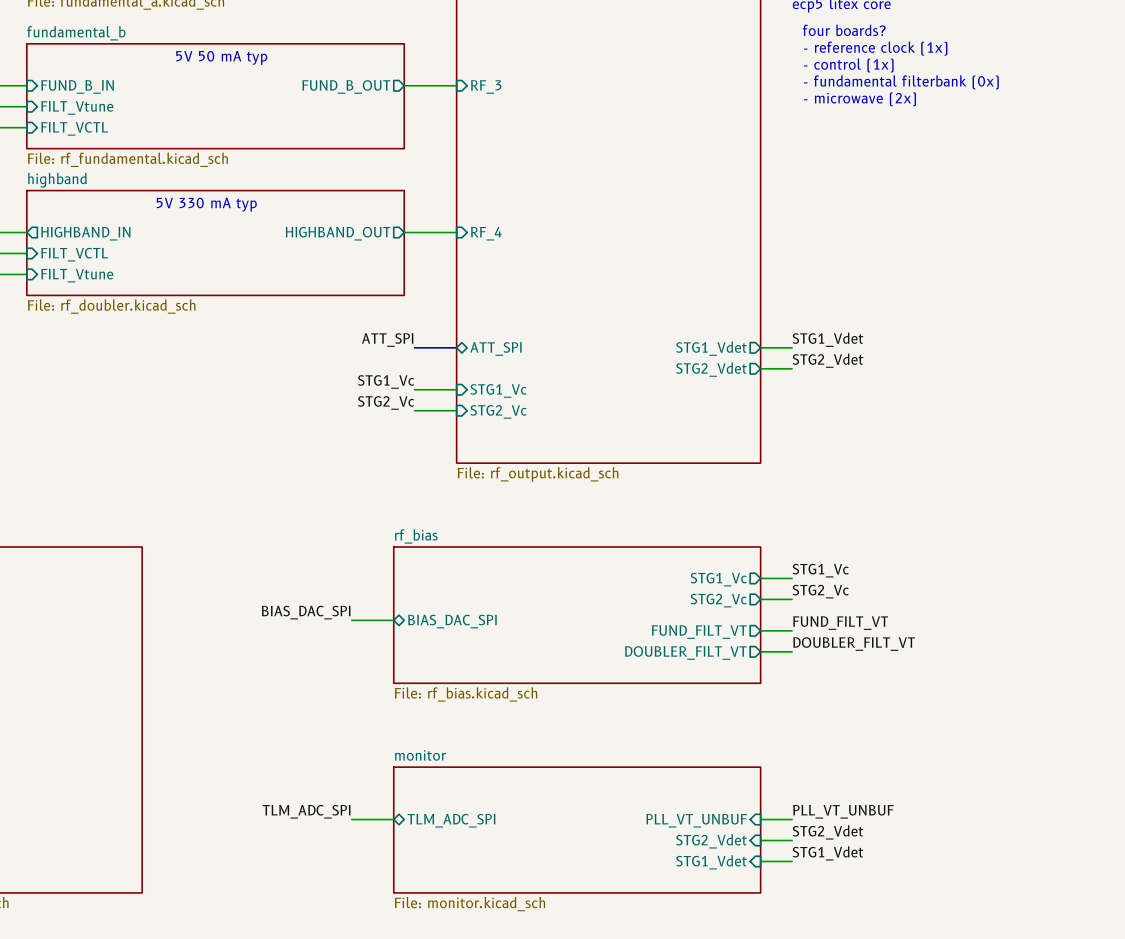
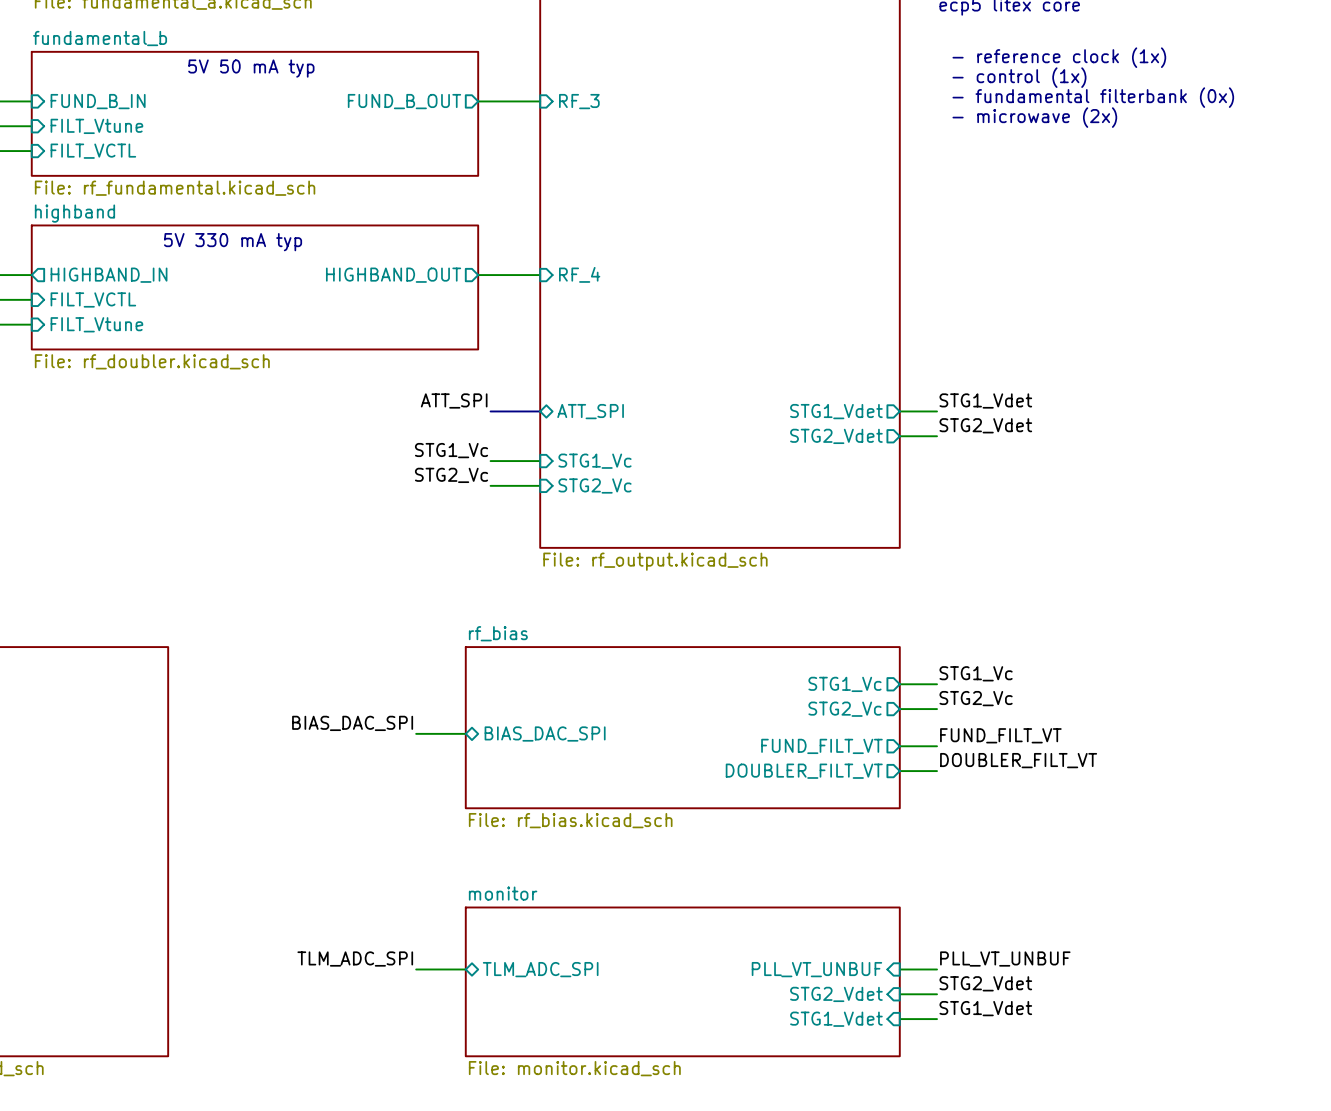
text: four boards? (844, 30) -> none

